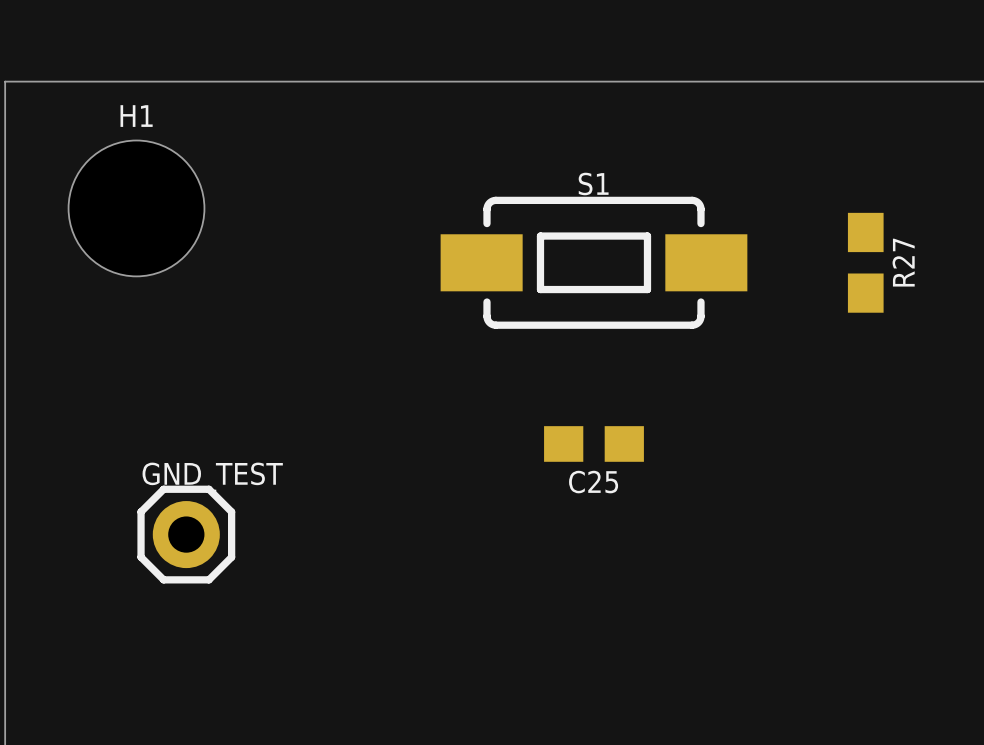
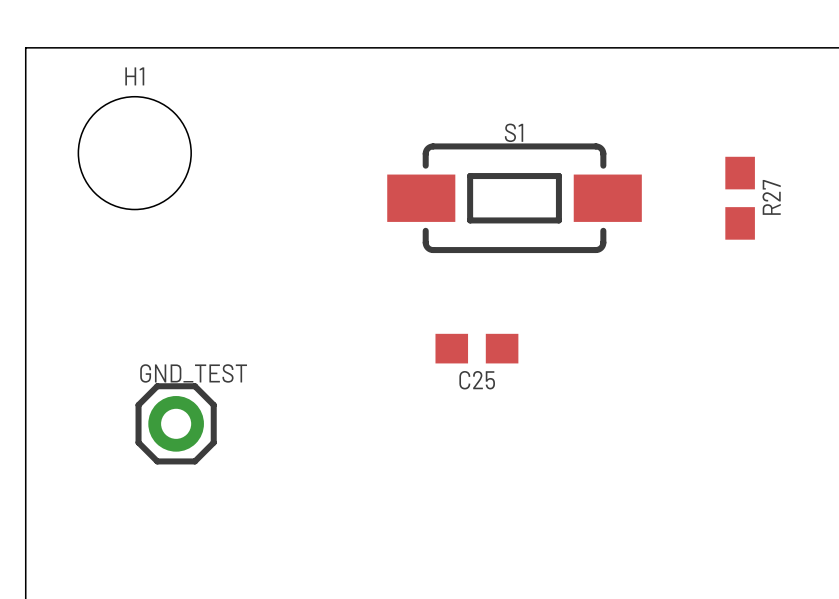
C25 position: (593, 443) -> (476, 348)

